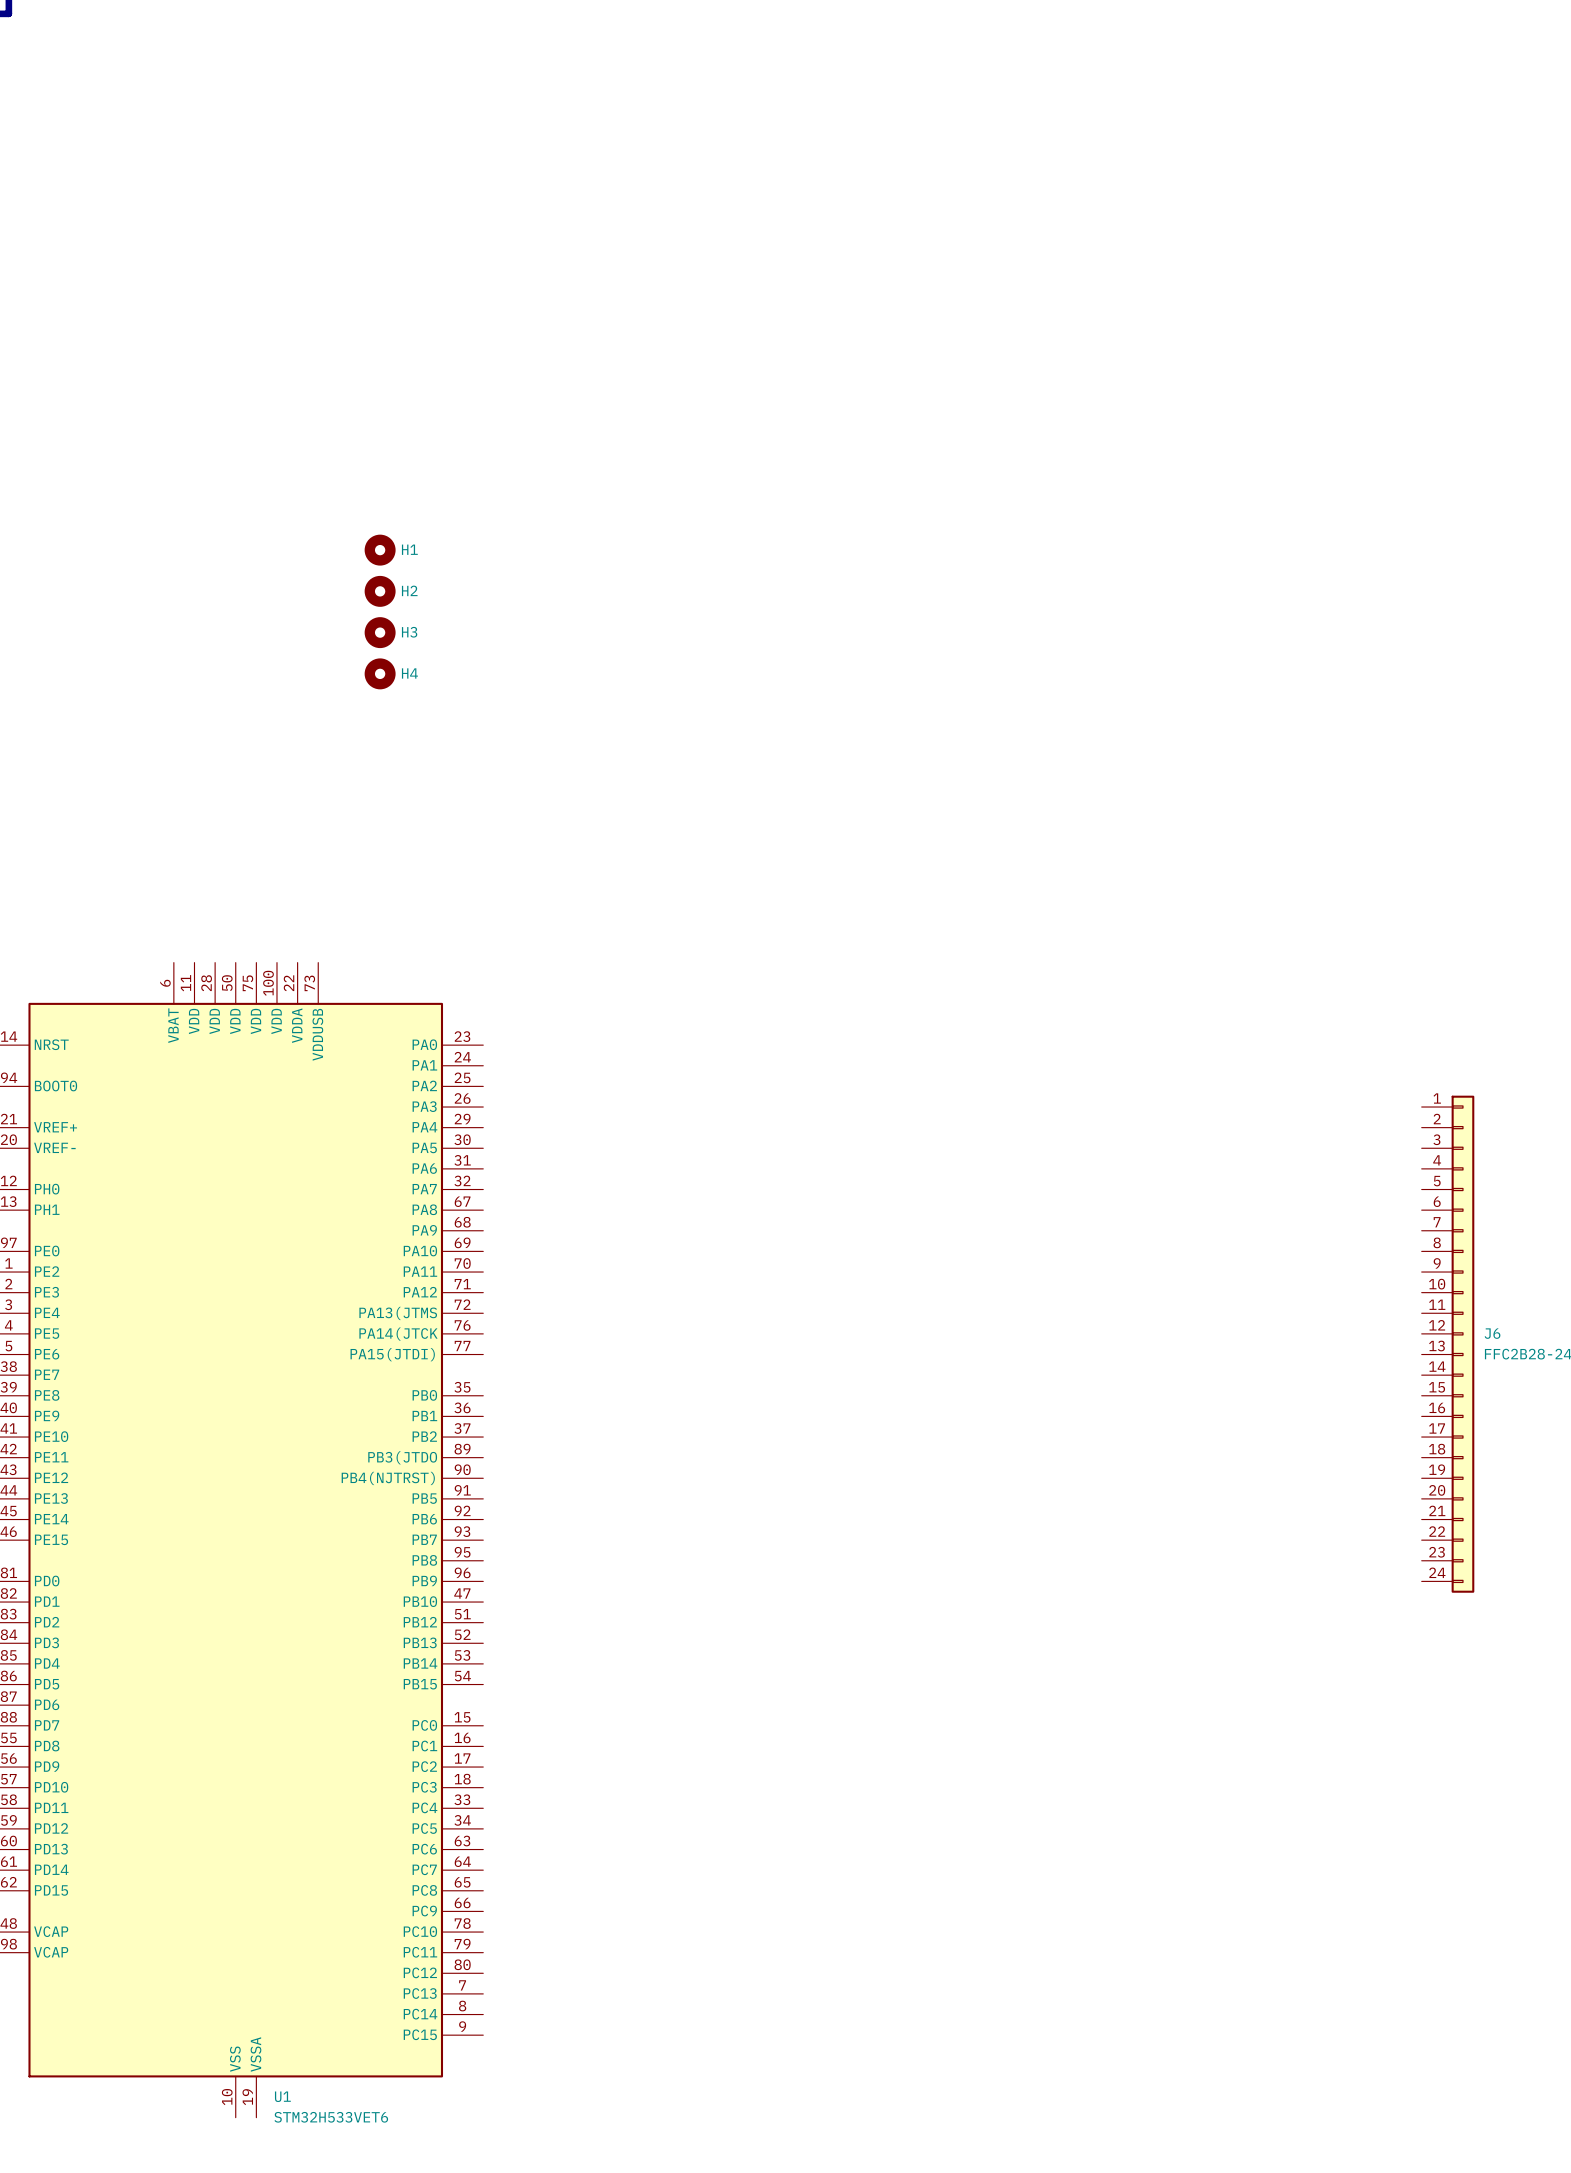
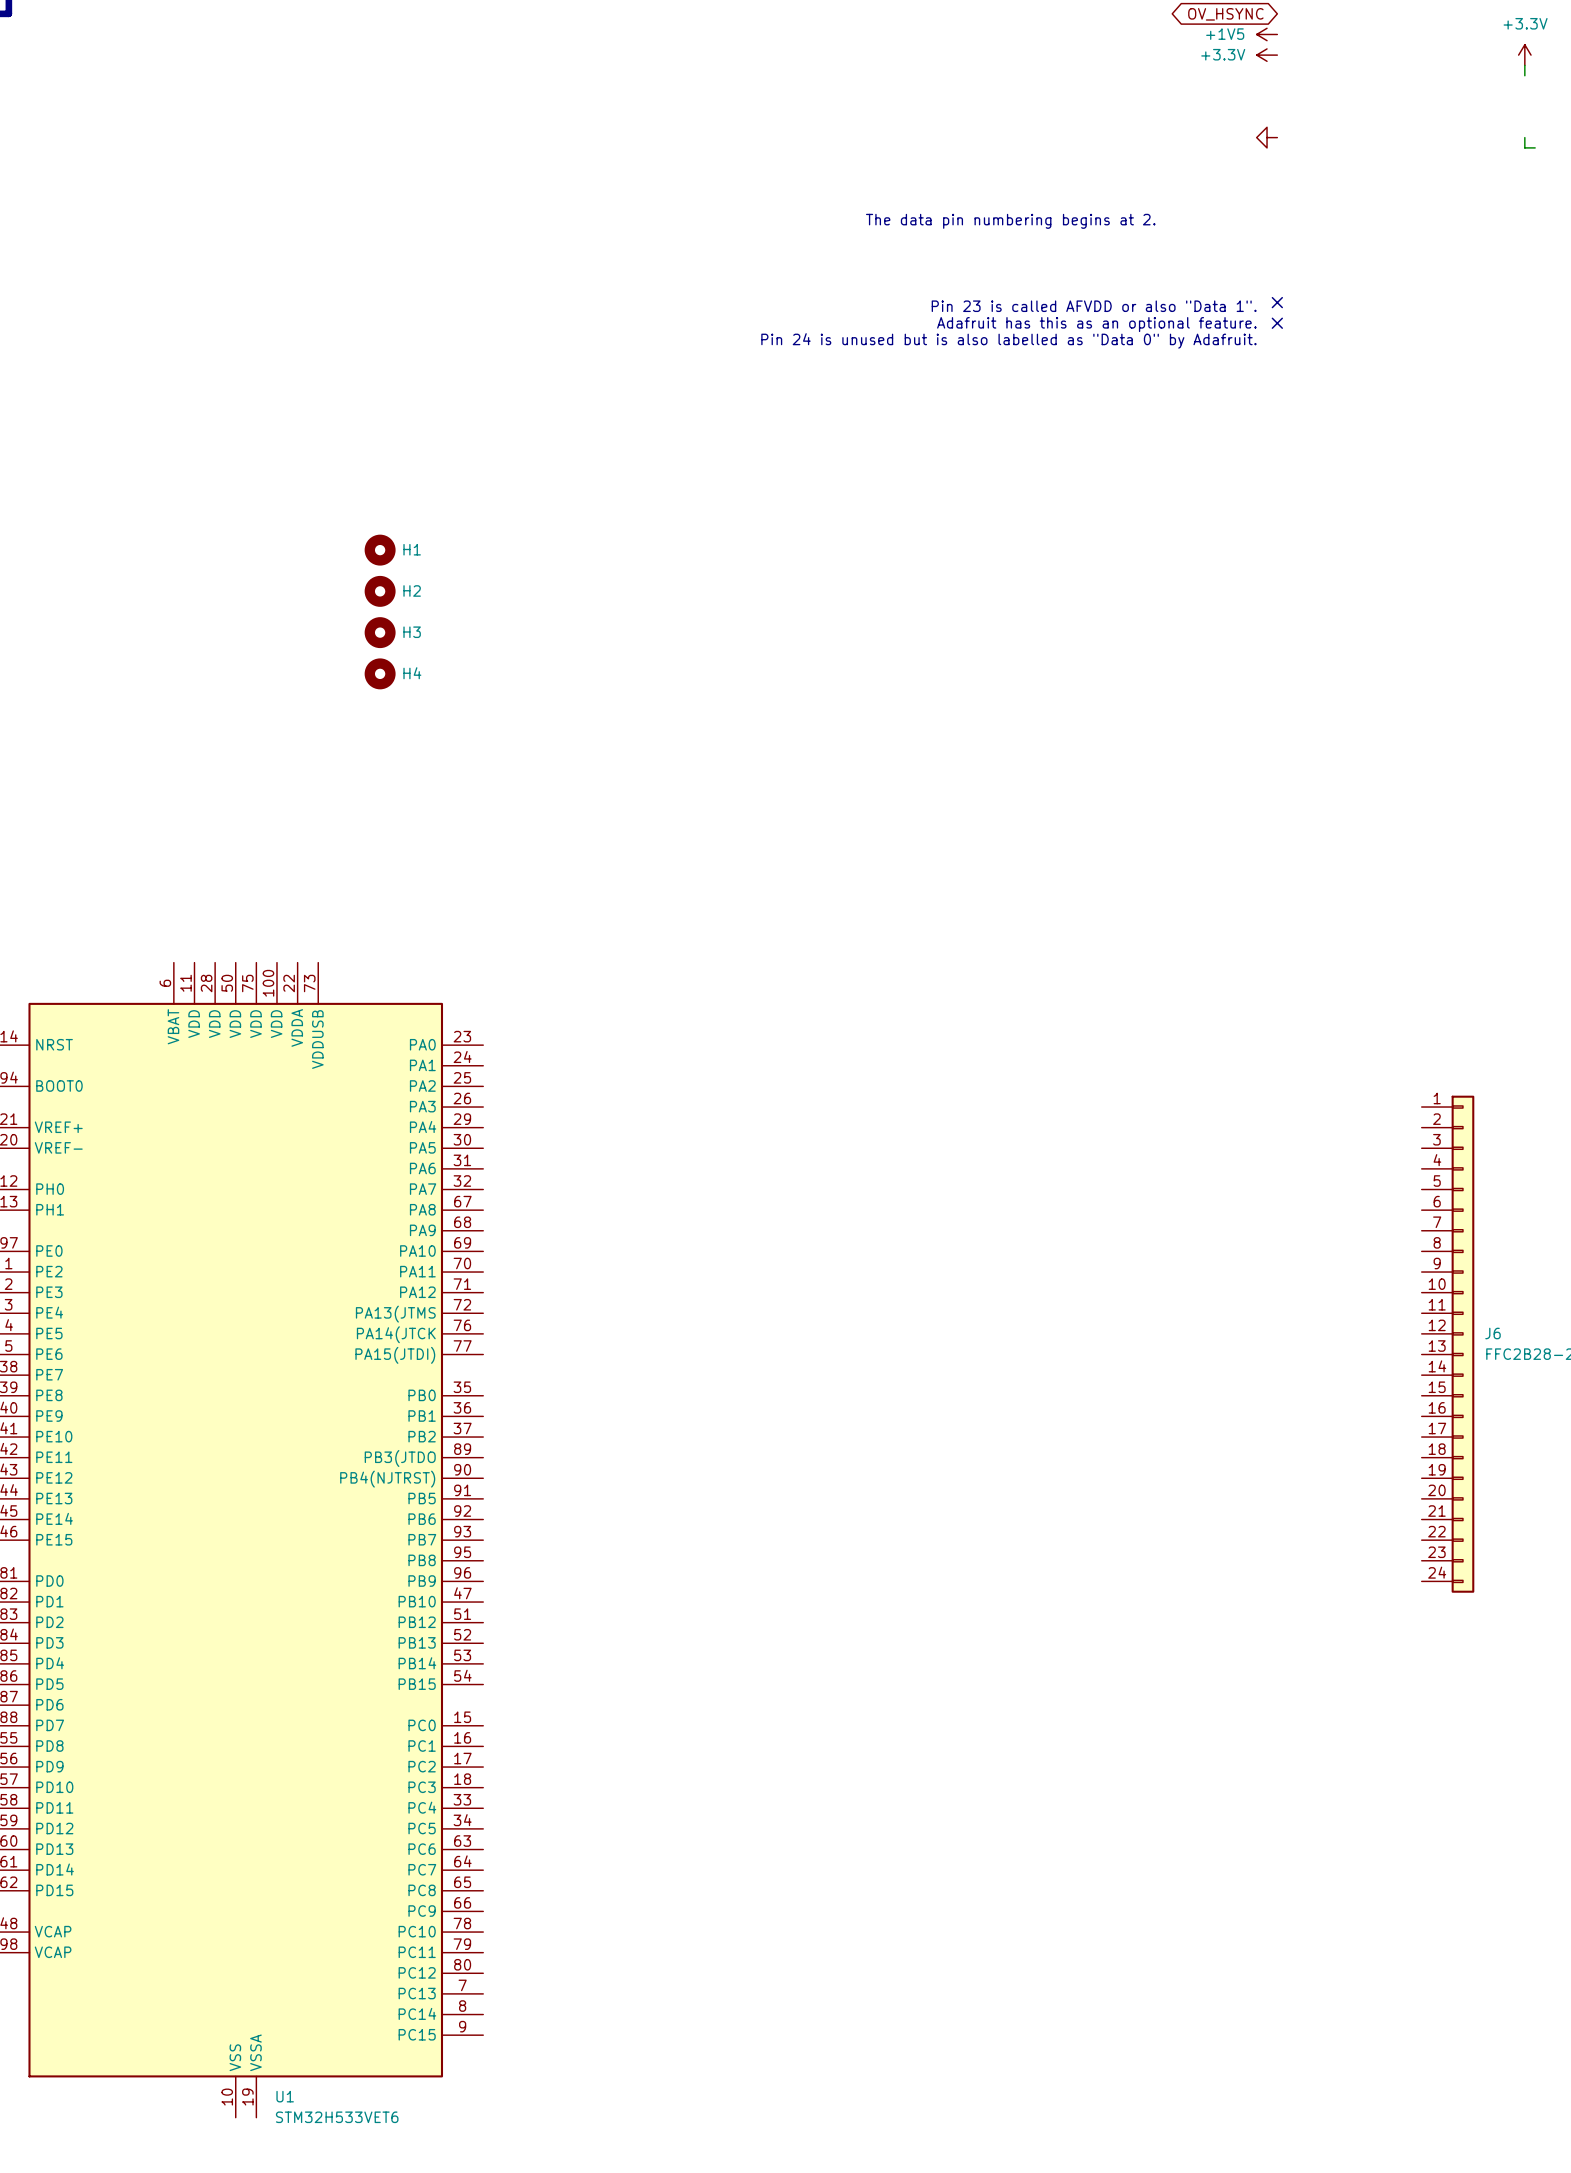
global label: none -> OV_HSYNC (1225, 14)
power symbol: none -> +1V5 (1267, 34)
power symbol: none -> +3.3V (1267, 55)
power symbol: none -> +3.3V (1524, 55)
wire: none -> (1524, 65) (1524, 75)
power symbol: none -> (1267, 137)
wire: none -> (1524, 137) (1524, 147) (1535, 147)
text: none -> The data pin numbering begins at 2. (1010, 221)
no-connect mark: none -> (1277, 302)
text: none -> Pin 23 is called AFVDD or also "Data 1". (1094, 306)
text: none -> Adafruit has this as an optional feature. (1096, 324)
no-connect mark: none -> (1277, 323)
text: none -> Pin 24 is unused but is also labelled as "Data 0" by Adafruit. (1008, 340)

